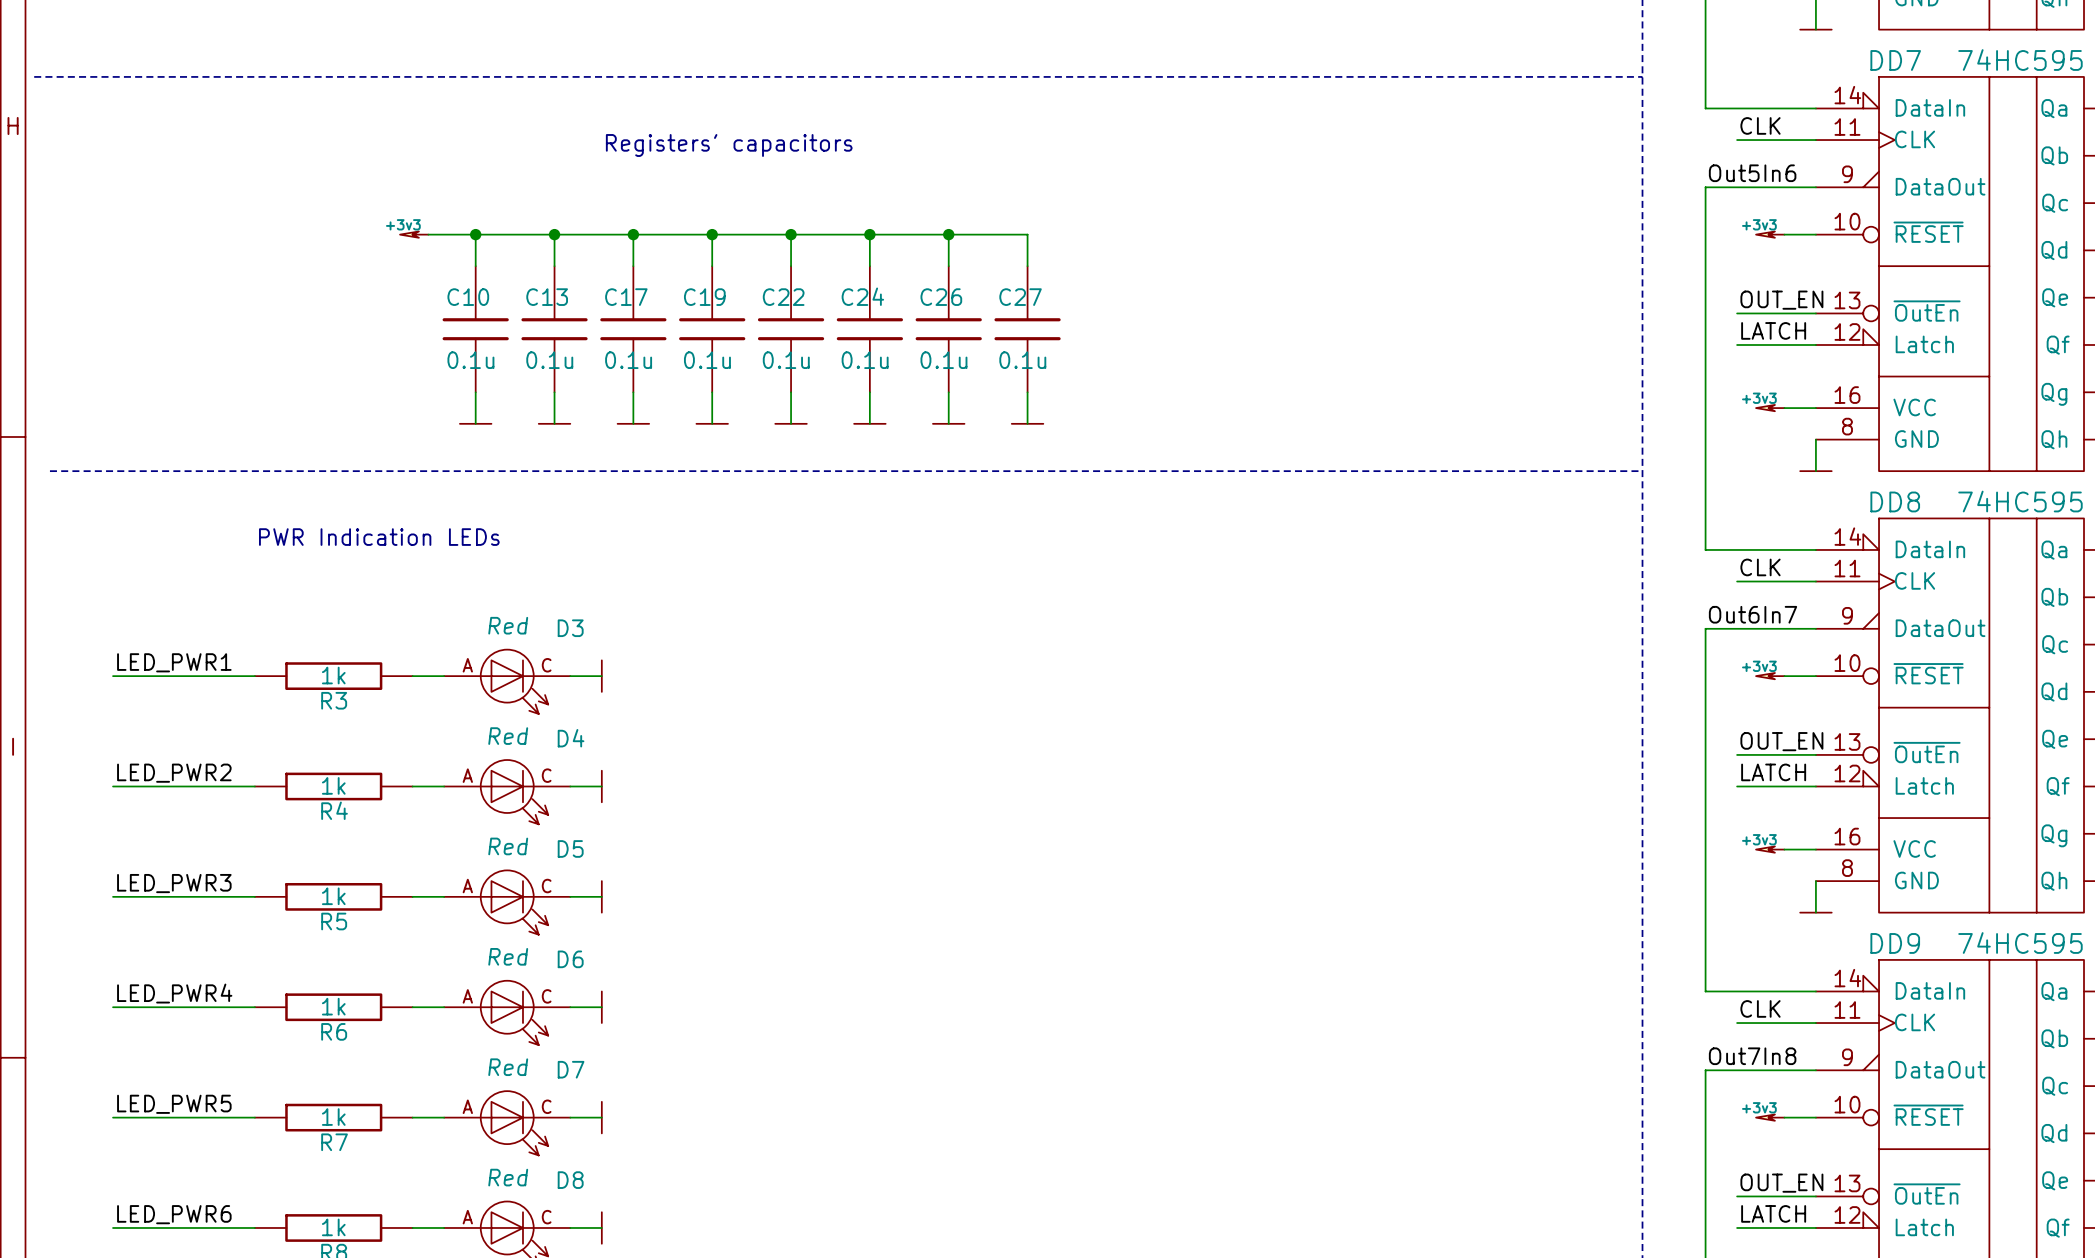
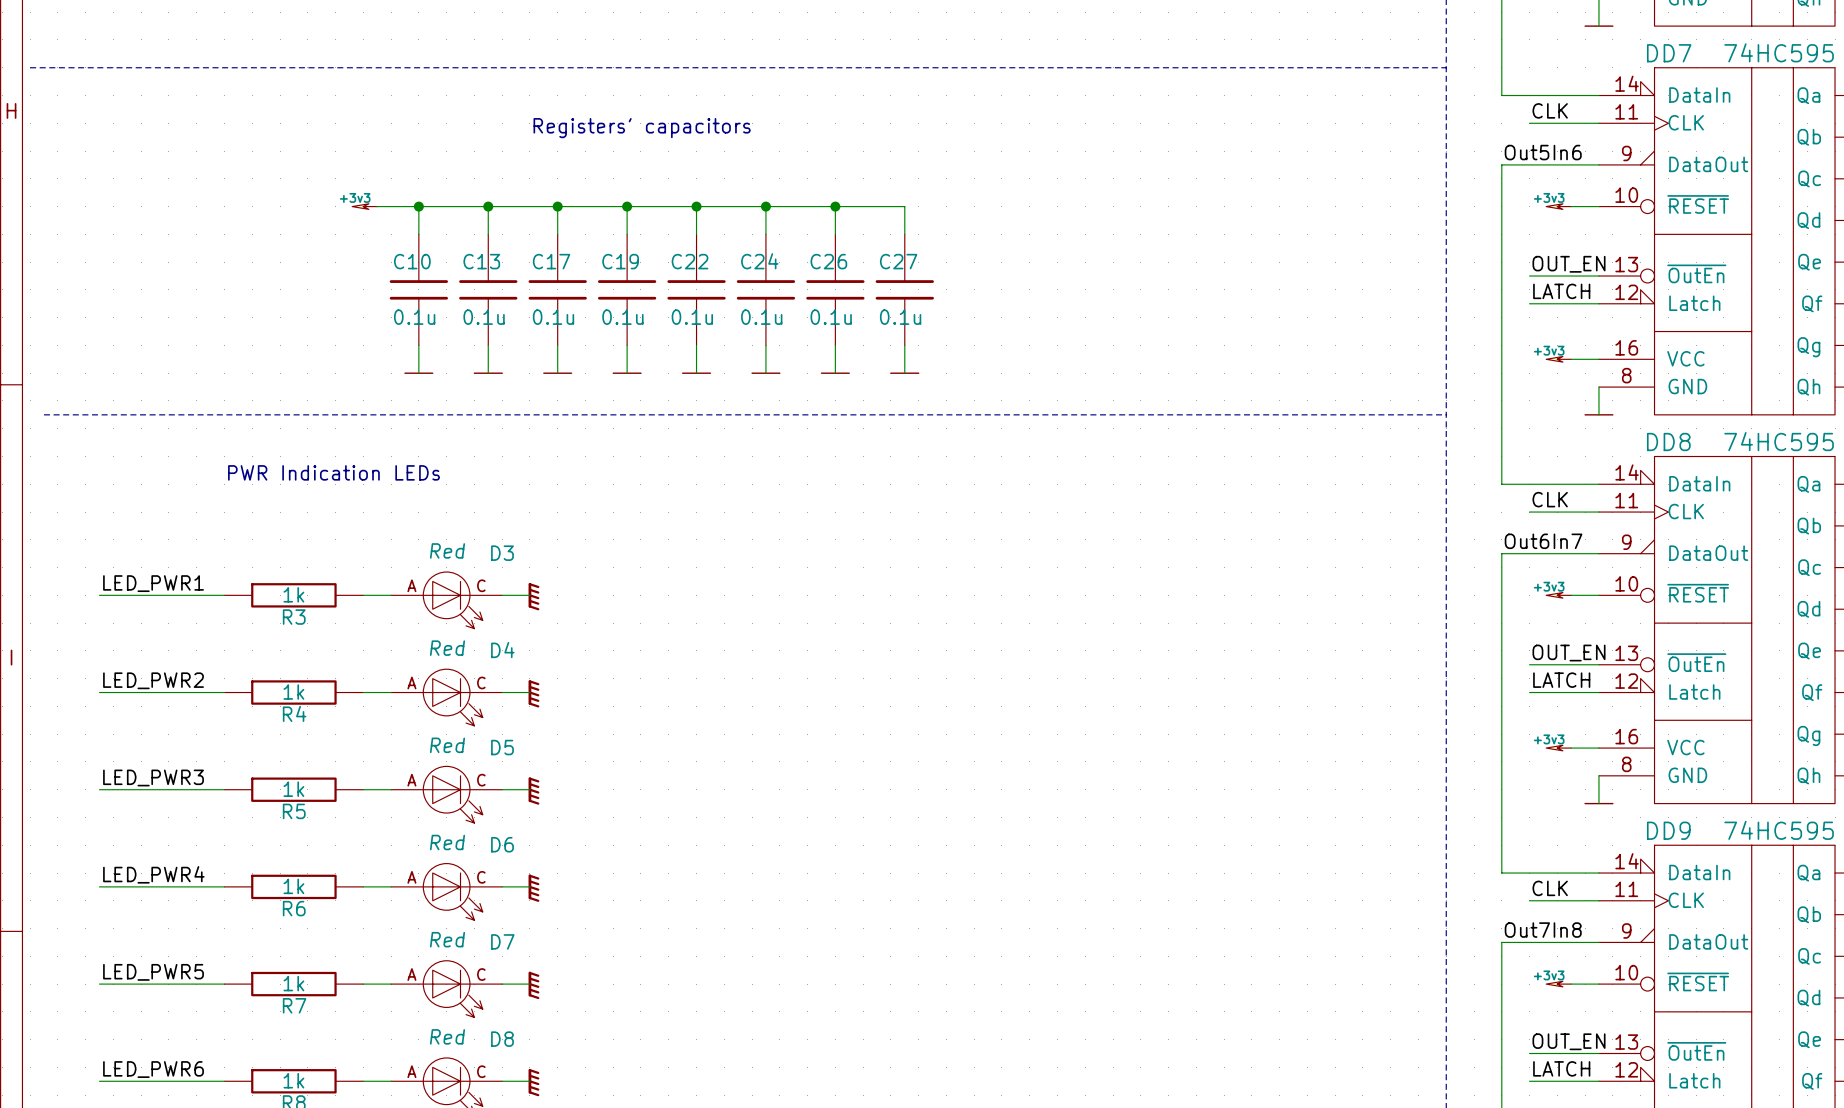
power symbol shape: [601, 659, 603, 693] -> [528, 582, 540, 611]
power symbol shape: [601, 769, 603, 804] -> [528, 680, 540, 708]
power symbol shape: [601, 880, 603, 914] -> [528, 777, 540, 805]
power symbol shape: [601, 990, 603, 1024] -> [528, 874, 540, 902]
power symbol shape: [601, 1101, 603, 1135] -> [528, 971, 540, 1000]
power symbol shape: [601, 1211, 603, 1245] -> [528, 1068, 540, 1097]

